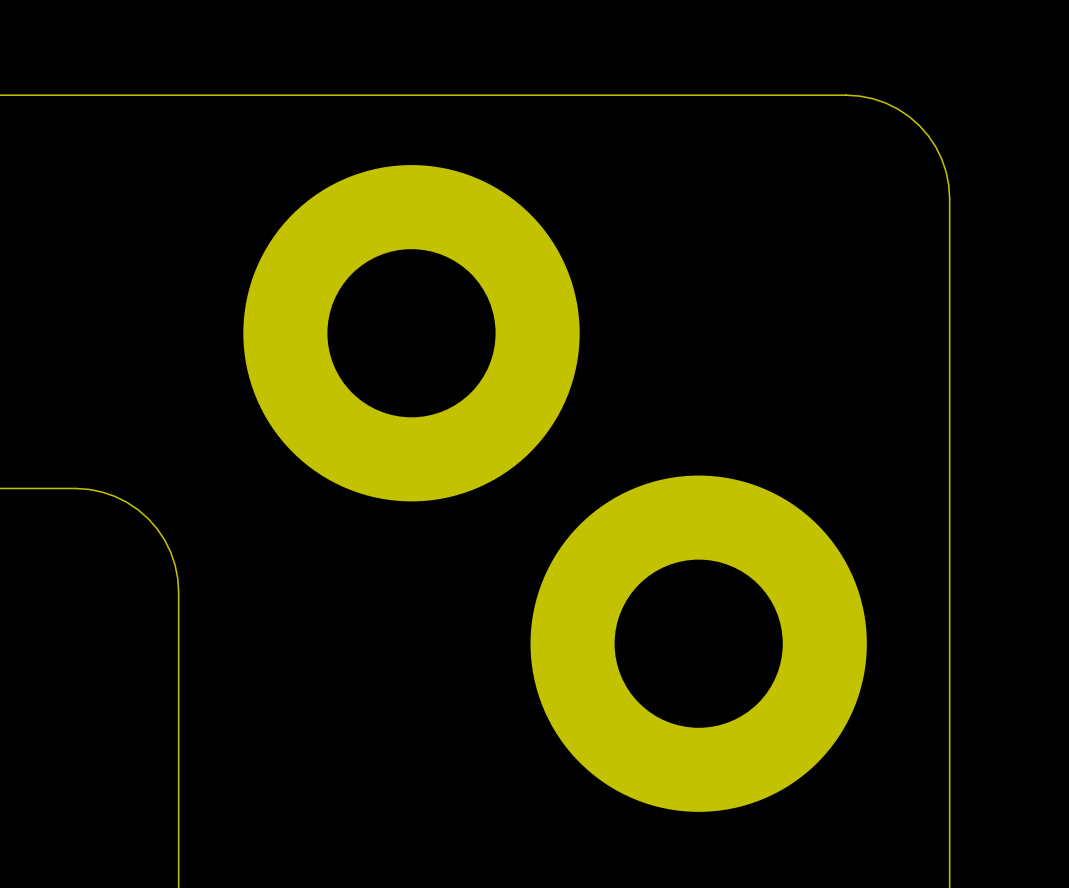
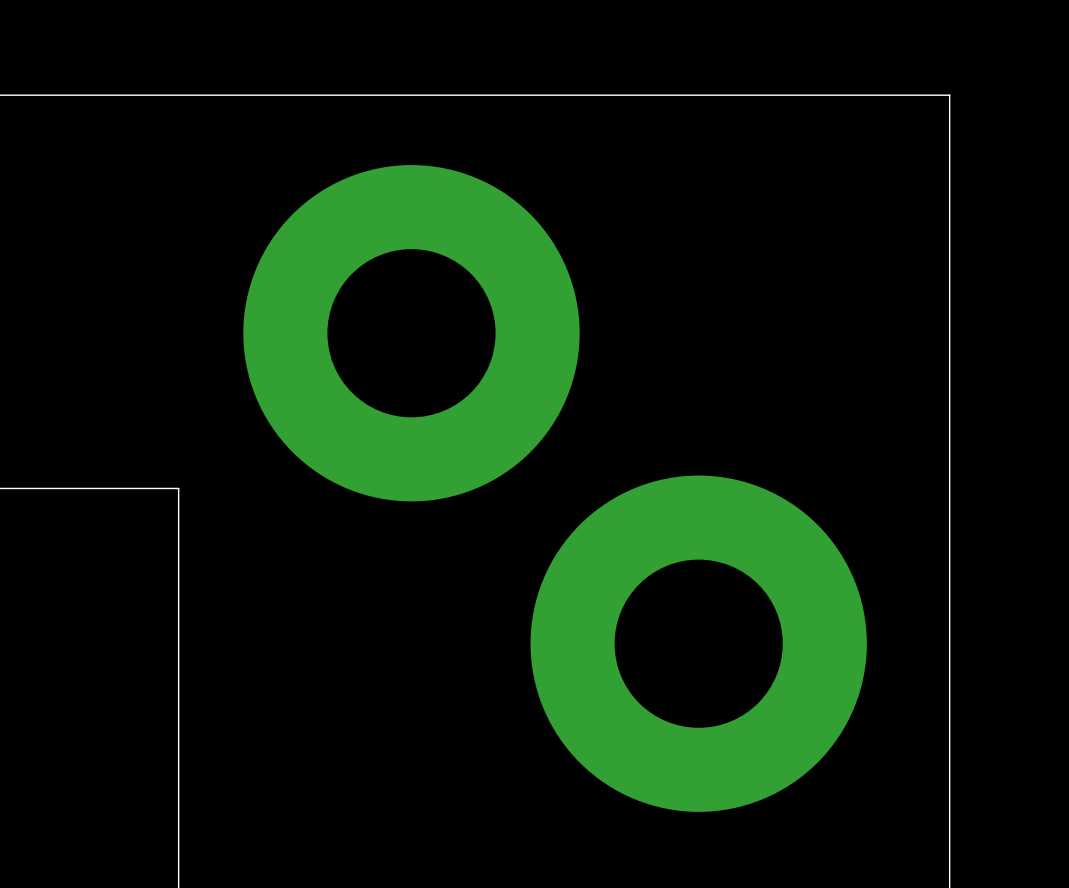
board edge: (846, 95) (859, 96) (885, 103) (897, 109) (919, 125) (935, 146) (941, 159) (948, 185) (949, 198) -> (846, 95) (949, 95) (949, 198)
board edge: (75, 488) (101, 492) (114, 496) (138, 509) (148, 518) (164, 540) (170, 552) (177, 578) (178, 591) -> (75, 488) (178, 488) (178, 591)

